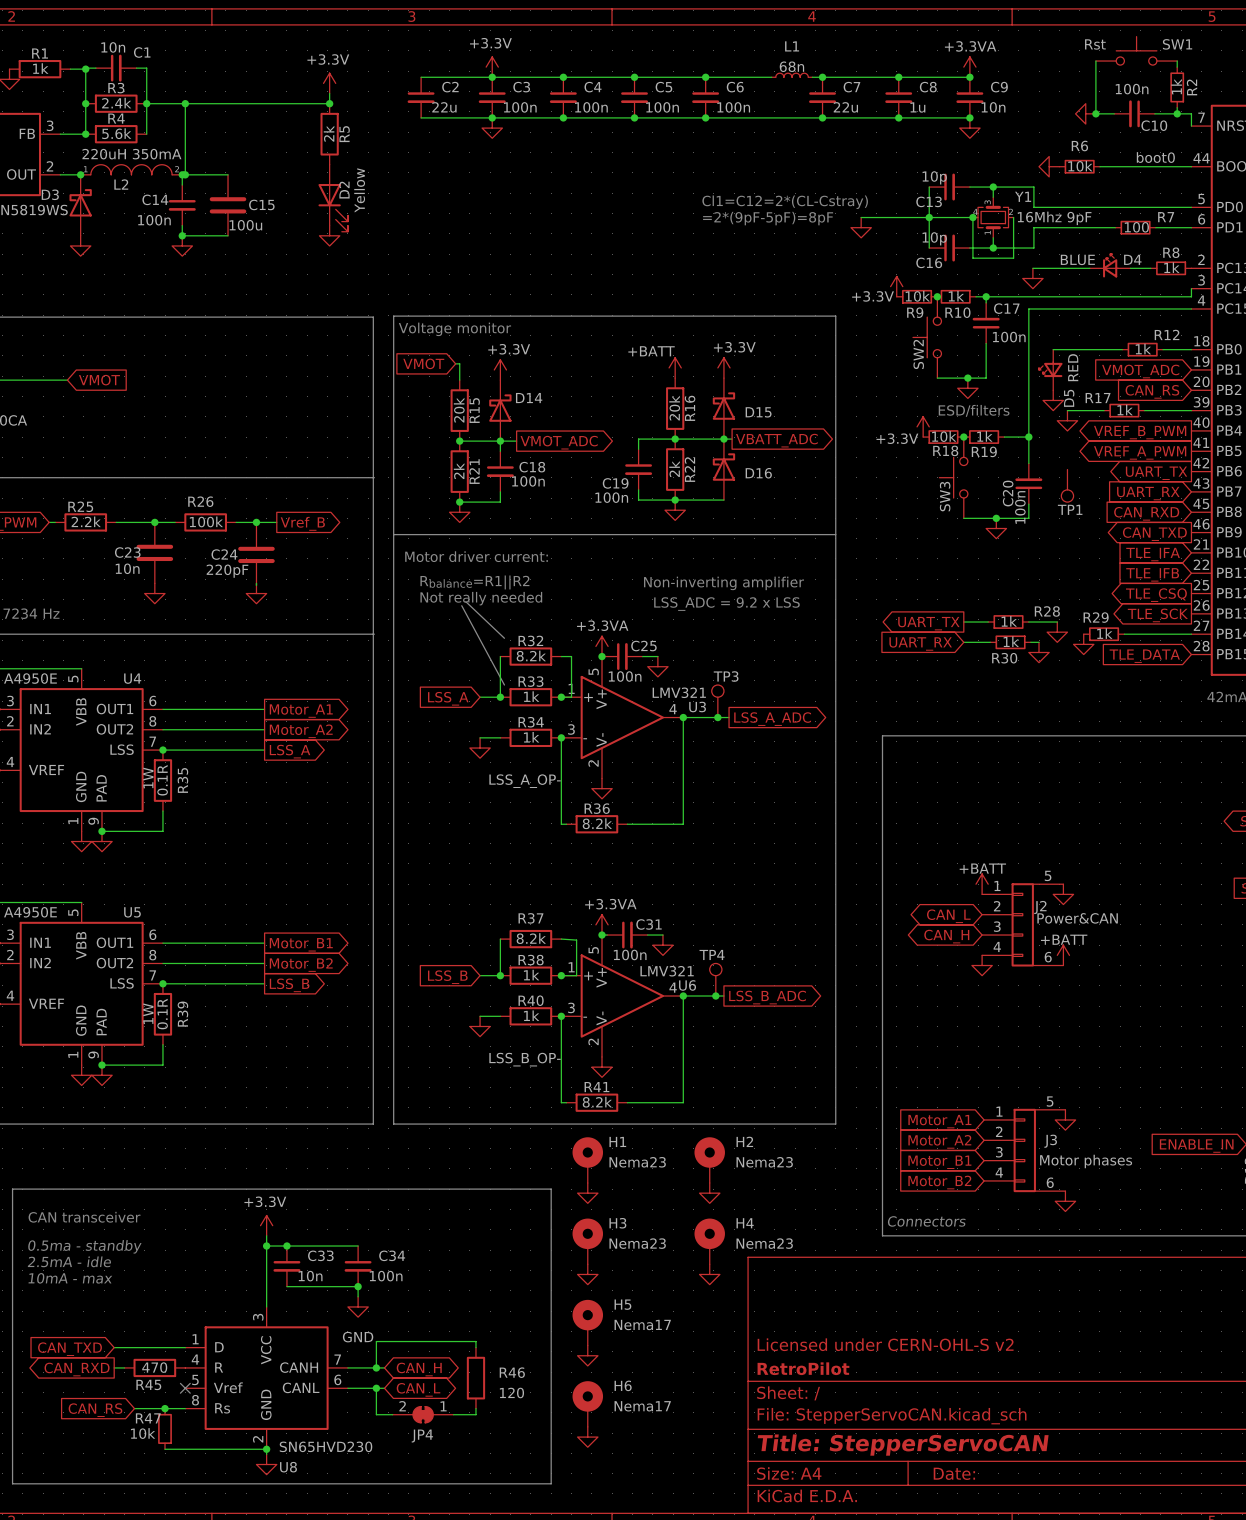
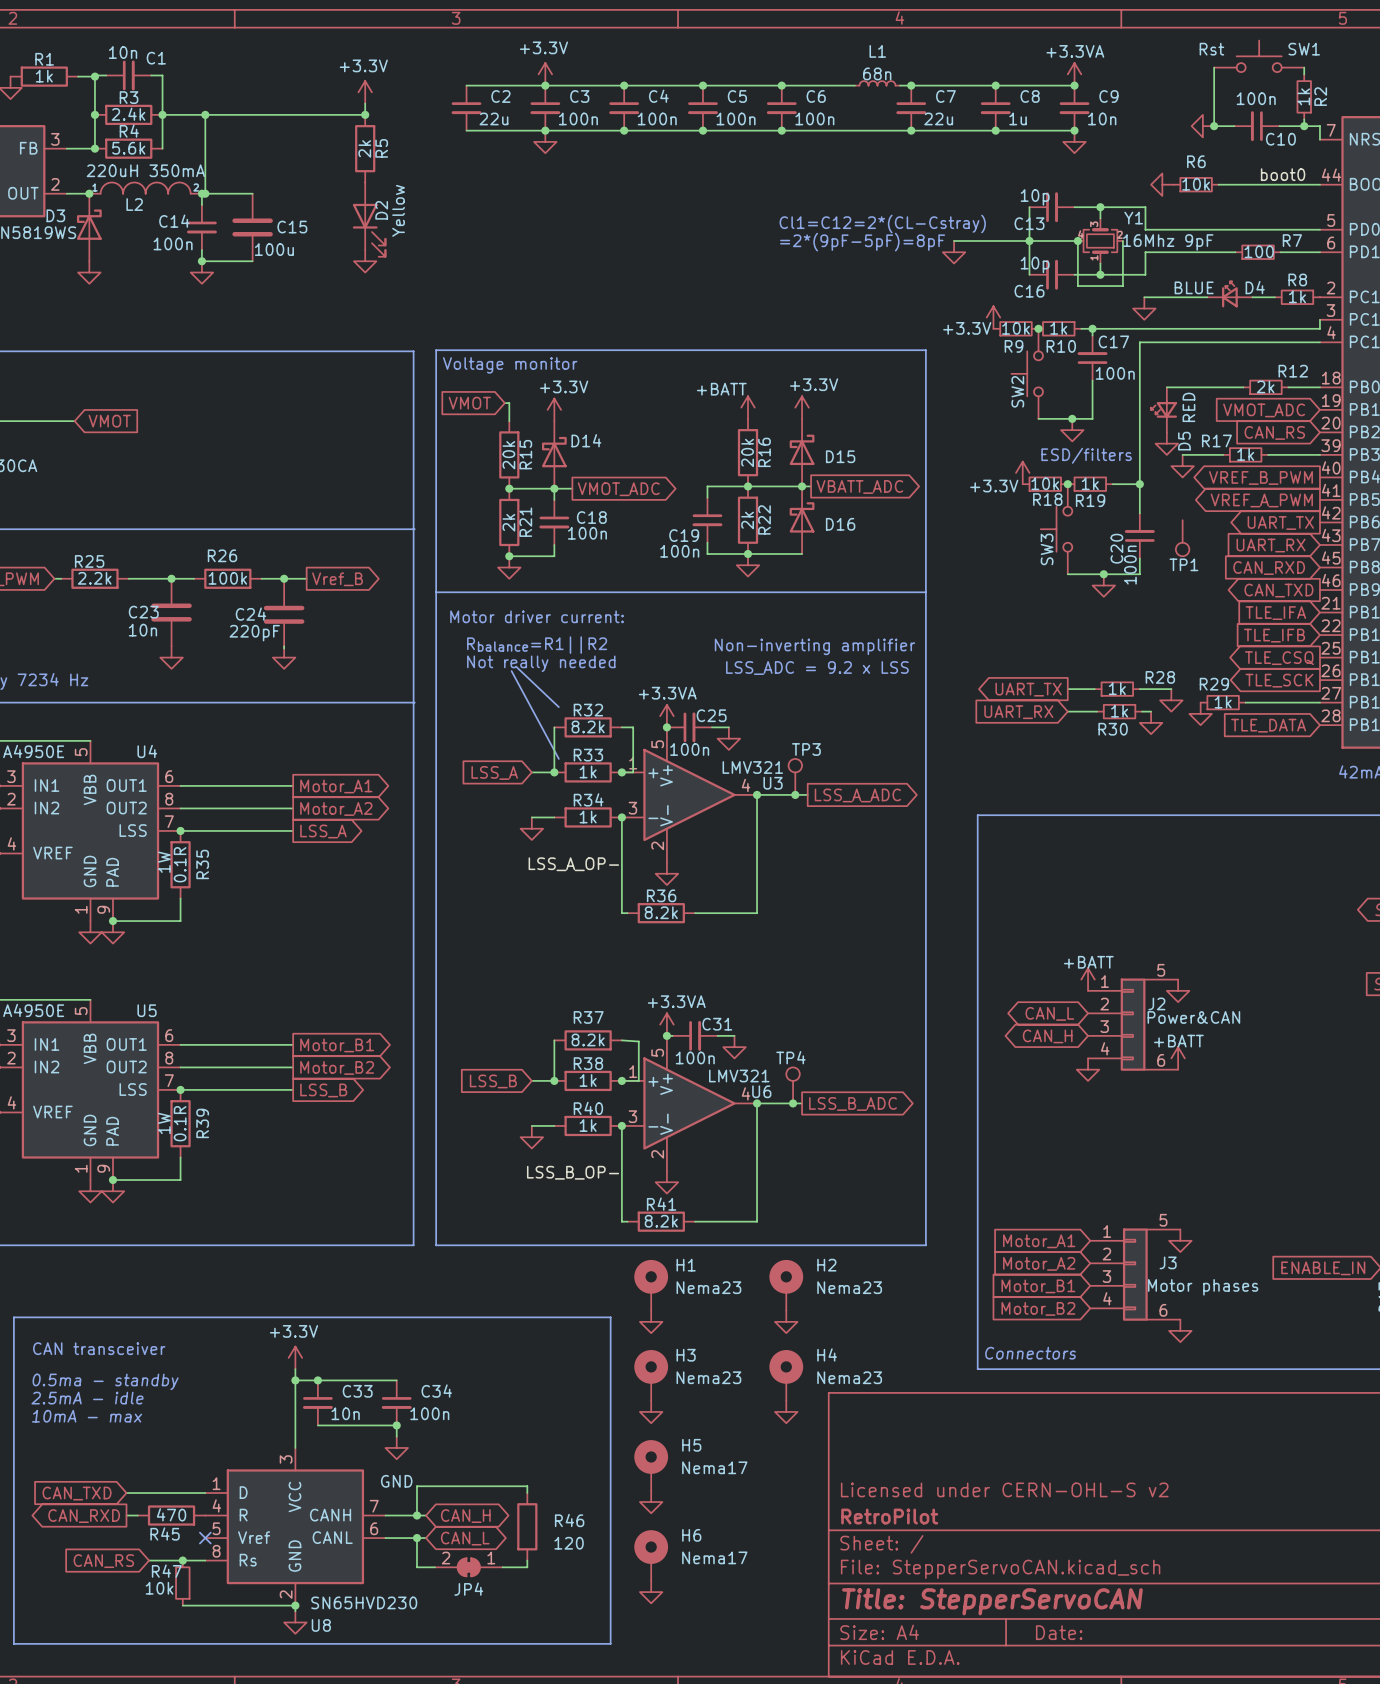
R12 value: 1k (1143, 349) -> 2k (1265, 386)

